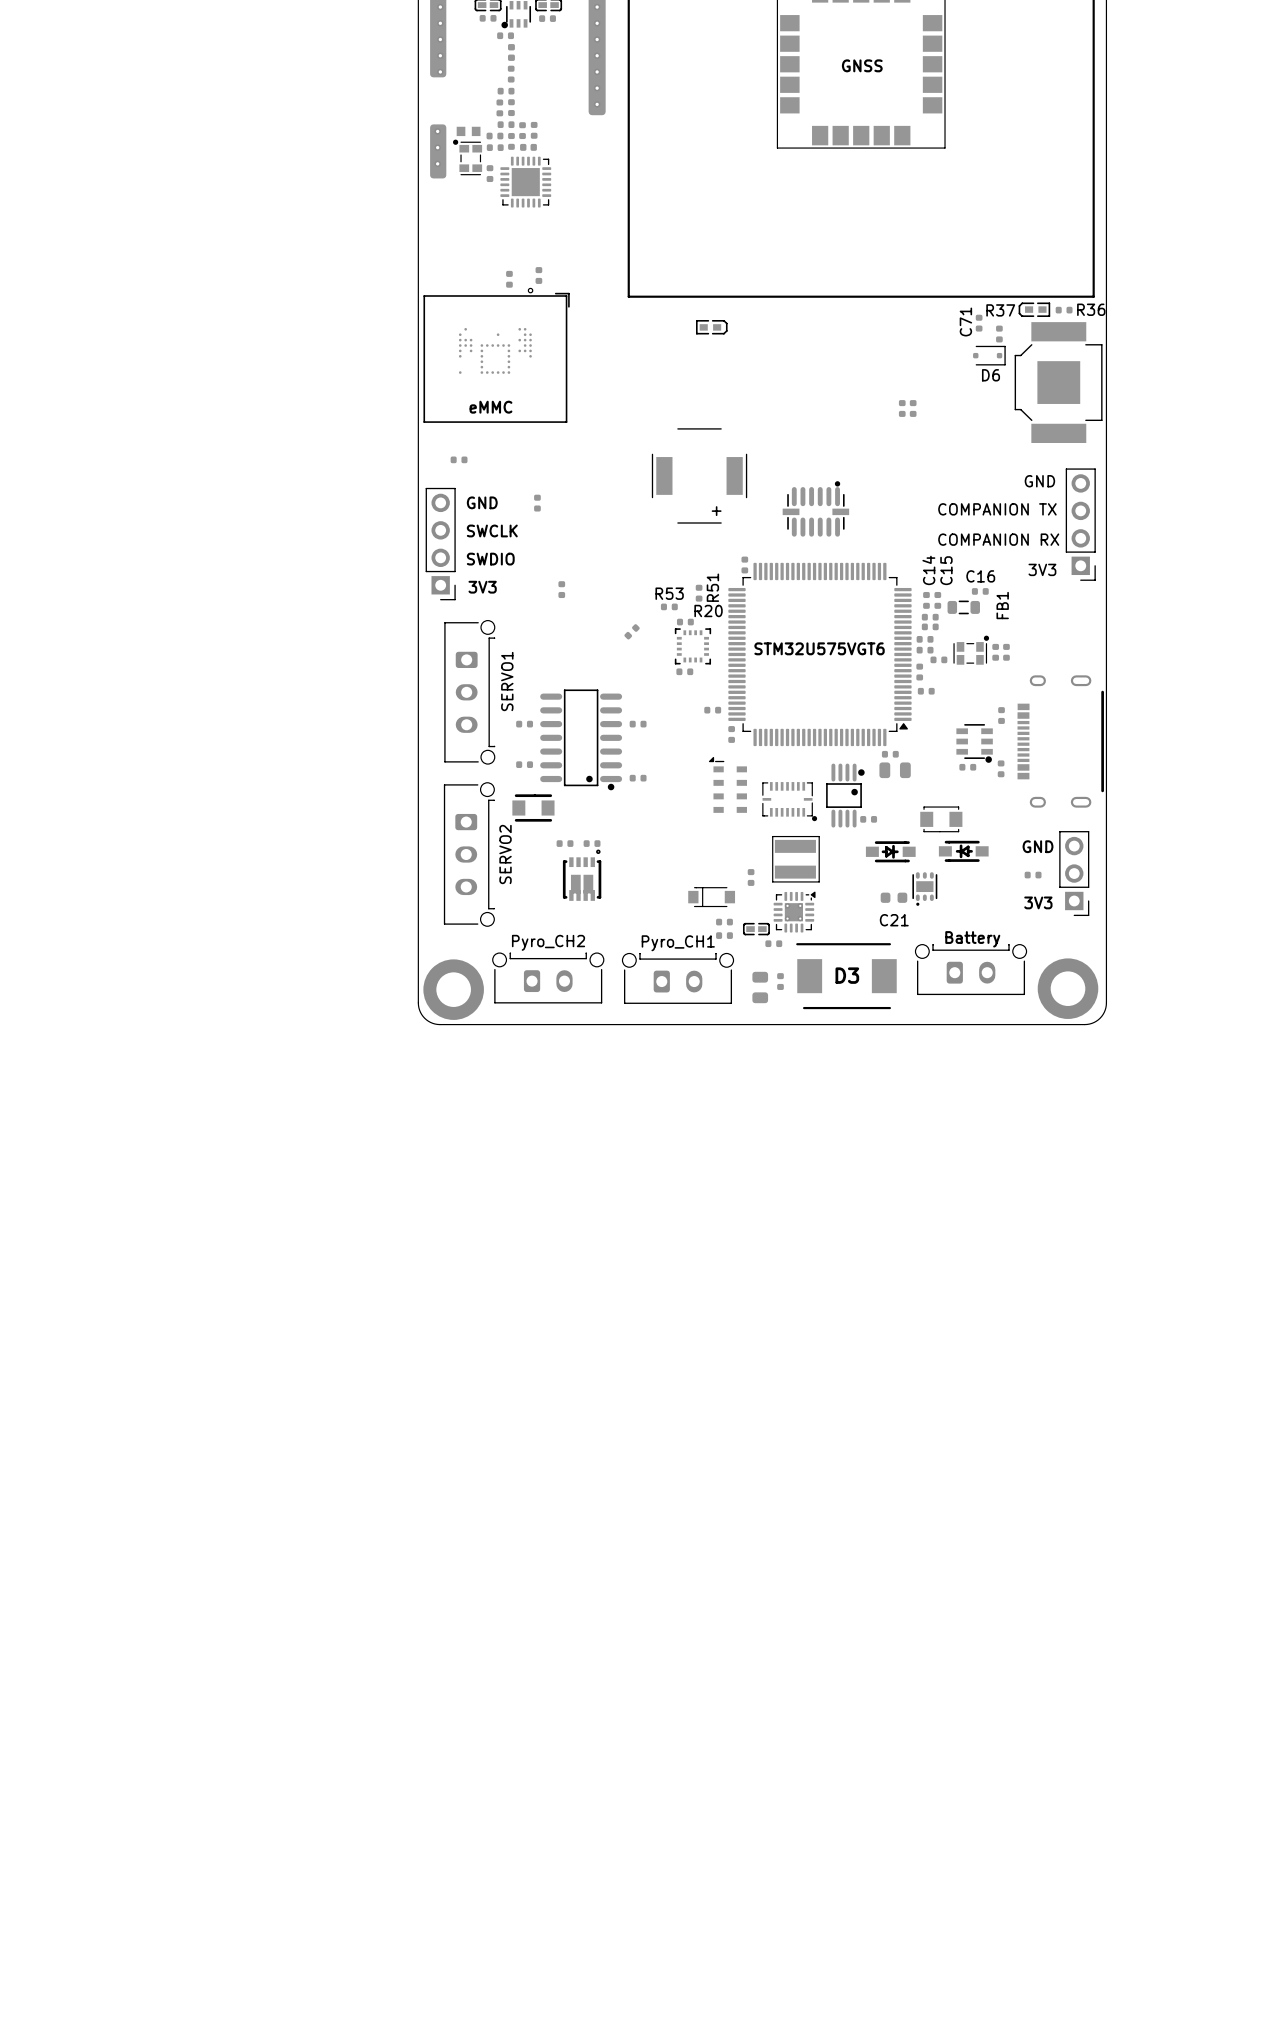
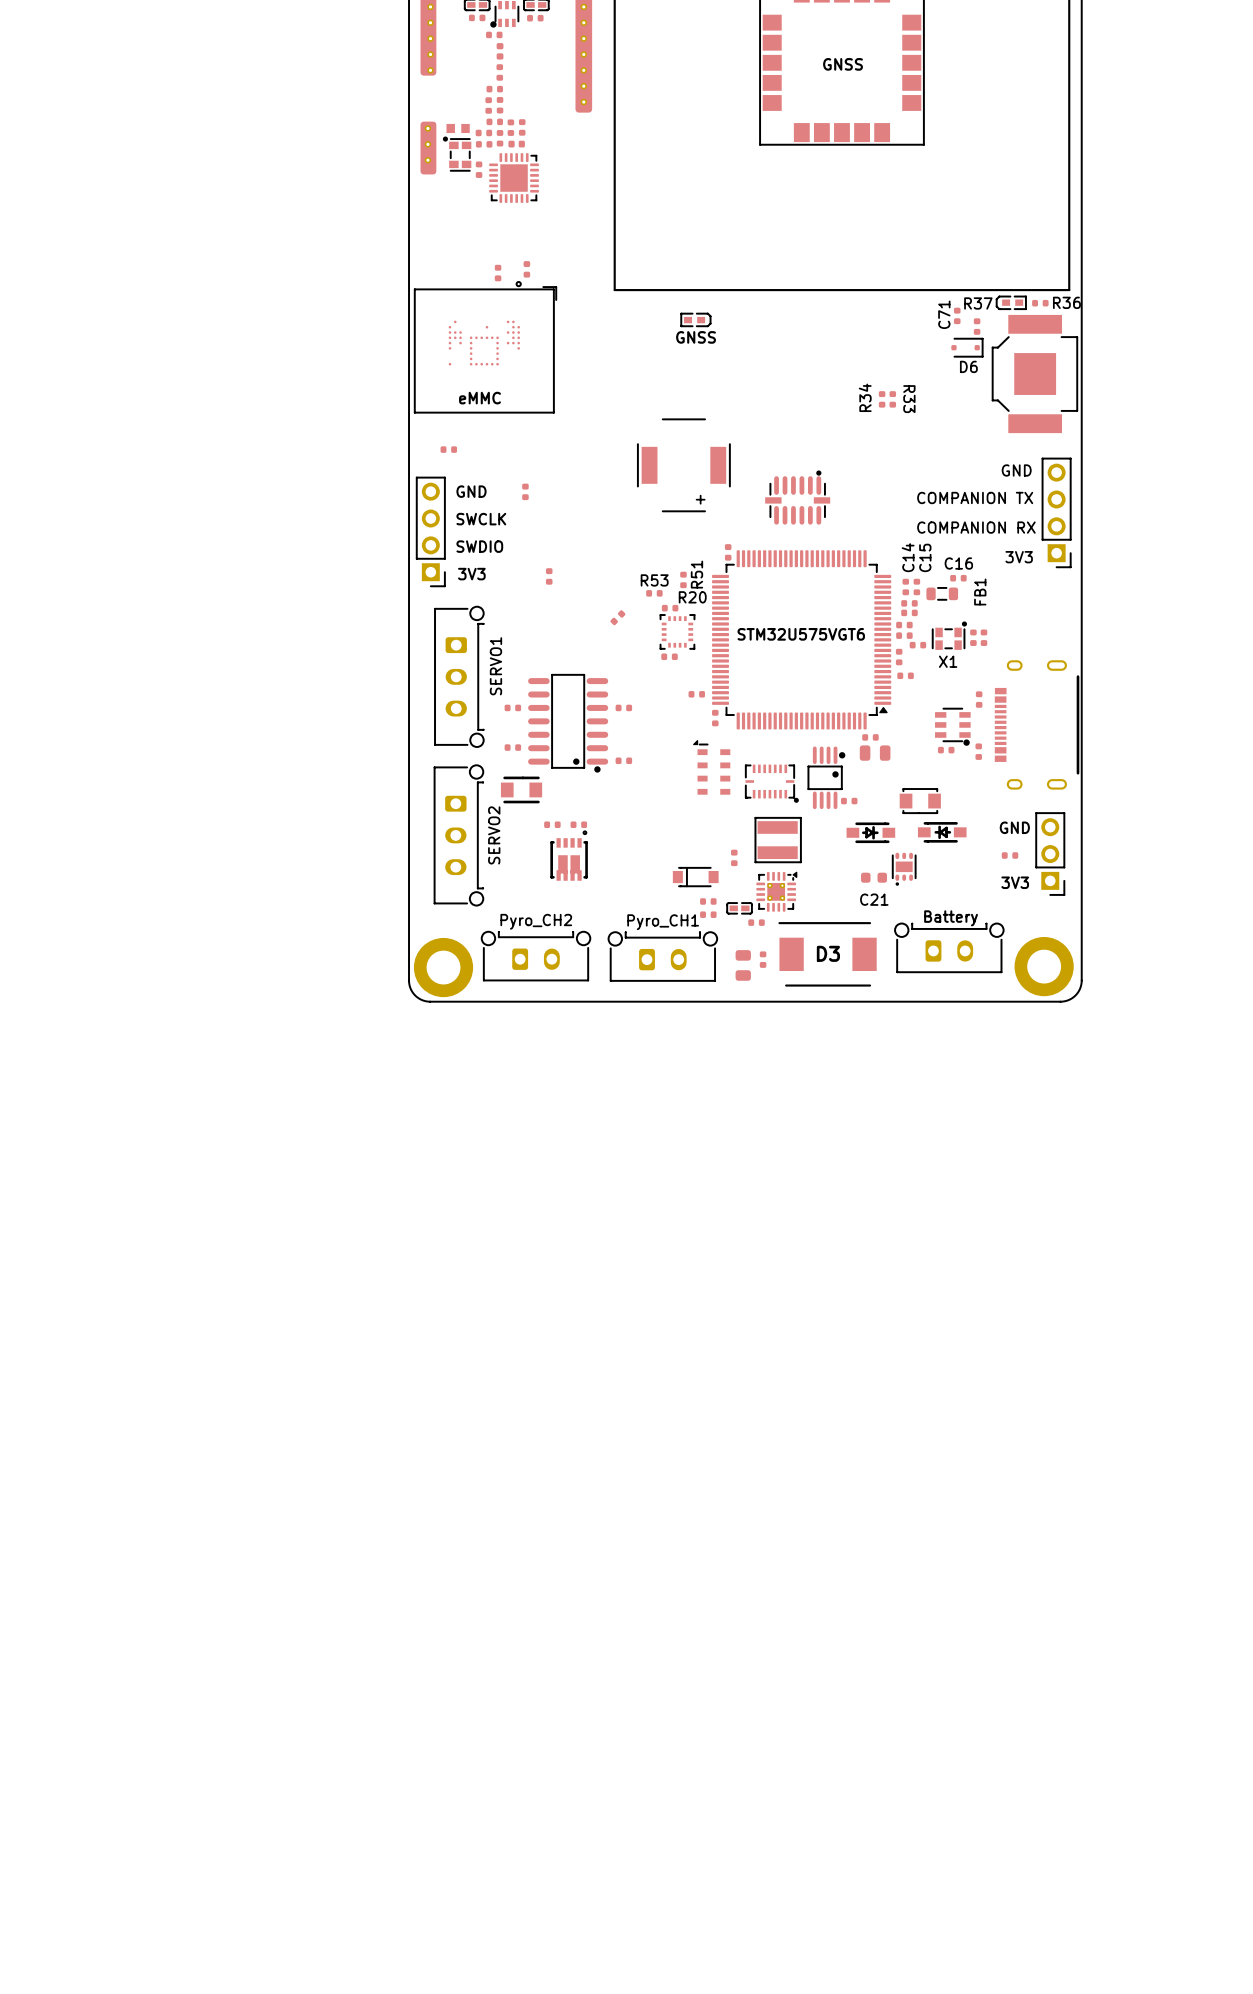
text: none -> GNSS (696, 337)
text: none -> R34 (865, 397)
text: none -> R33 (909, 399)
text: none -> X1 (948, 661)

